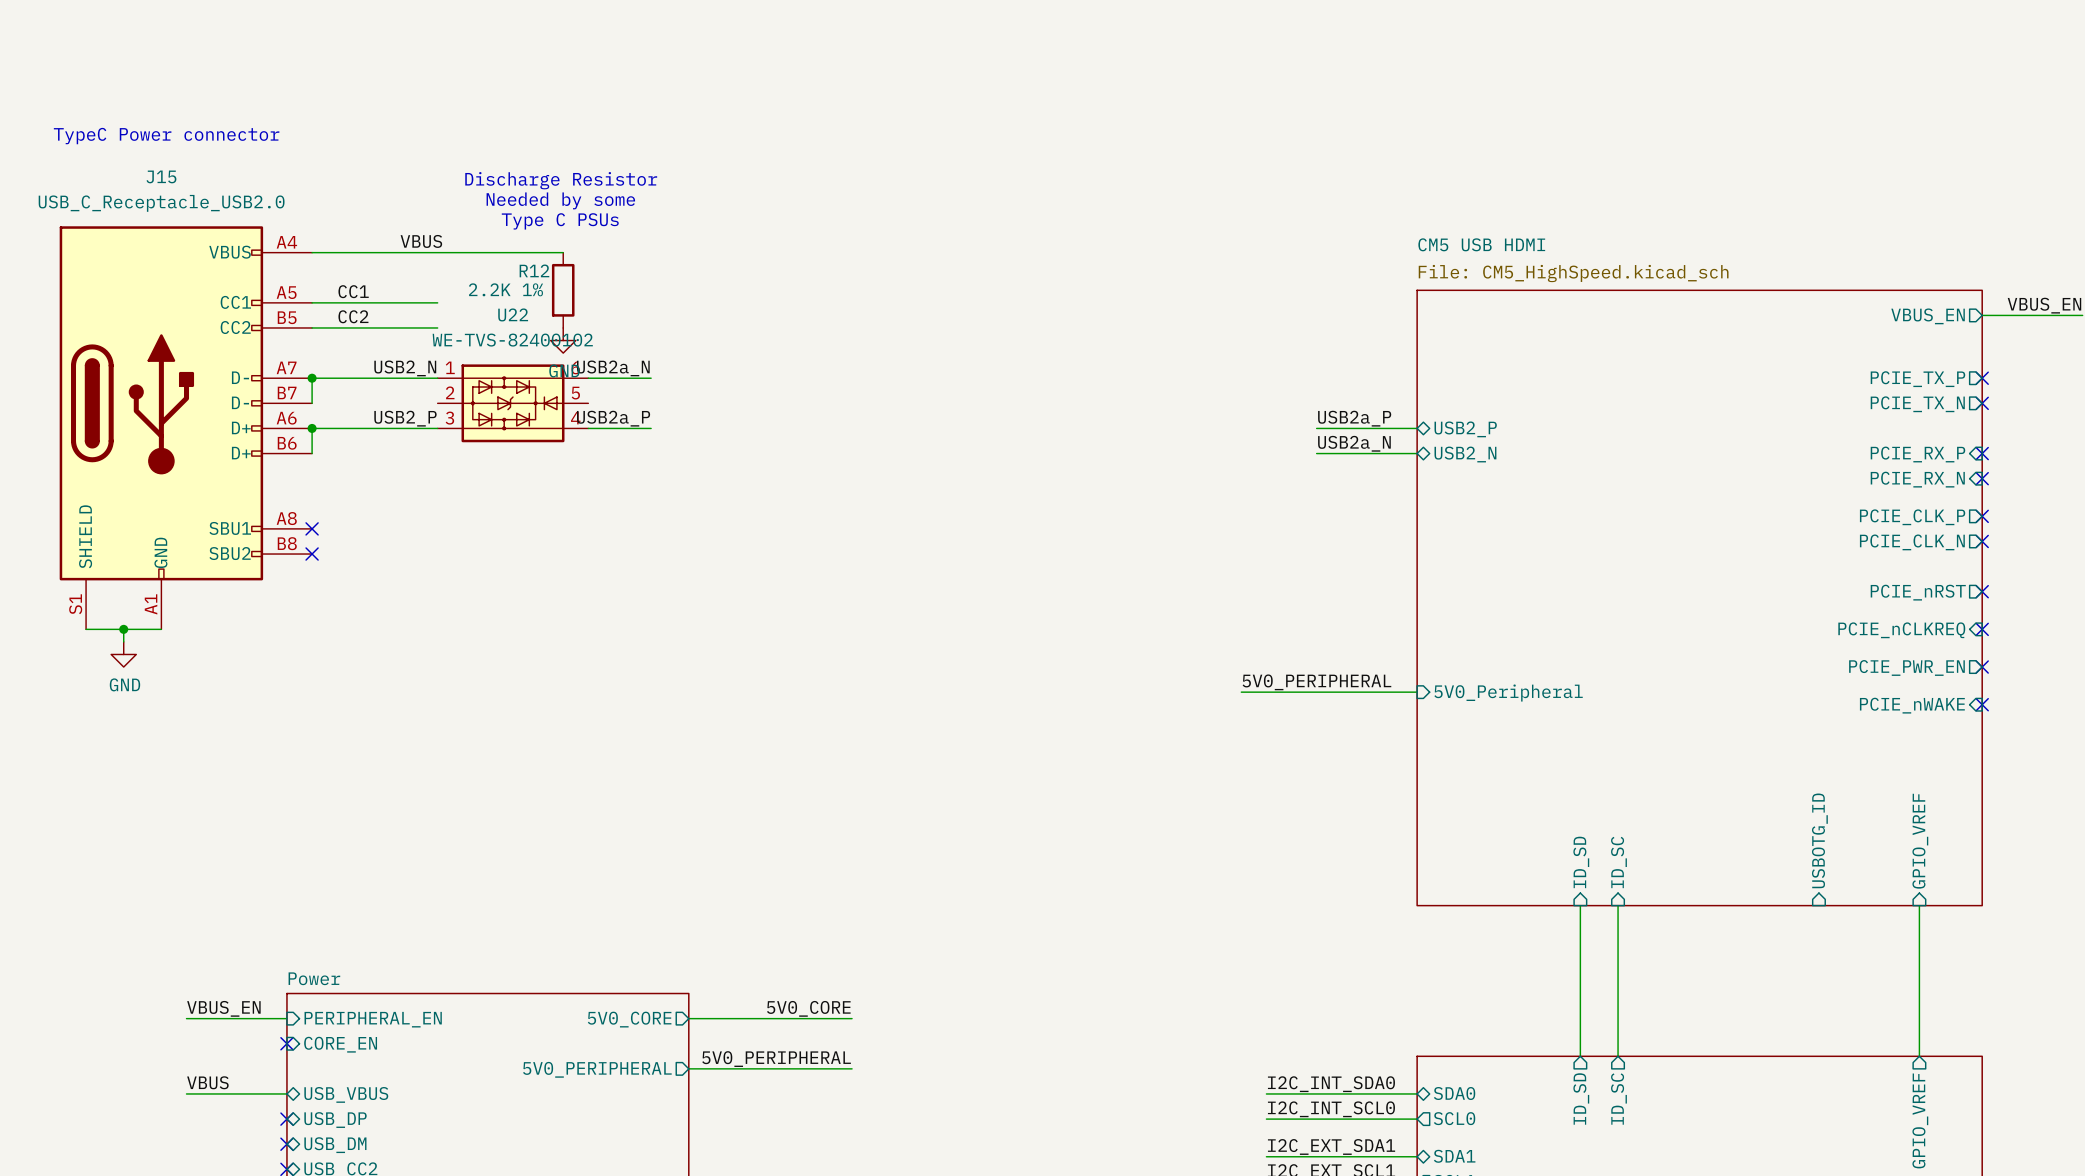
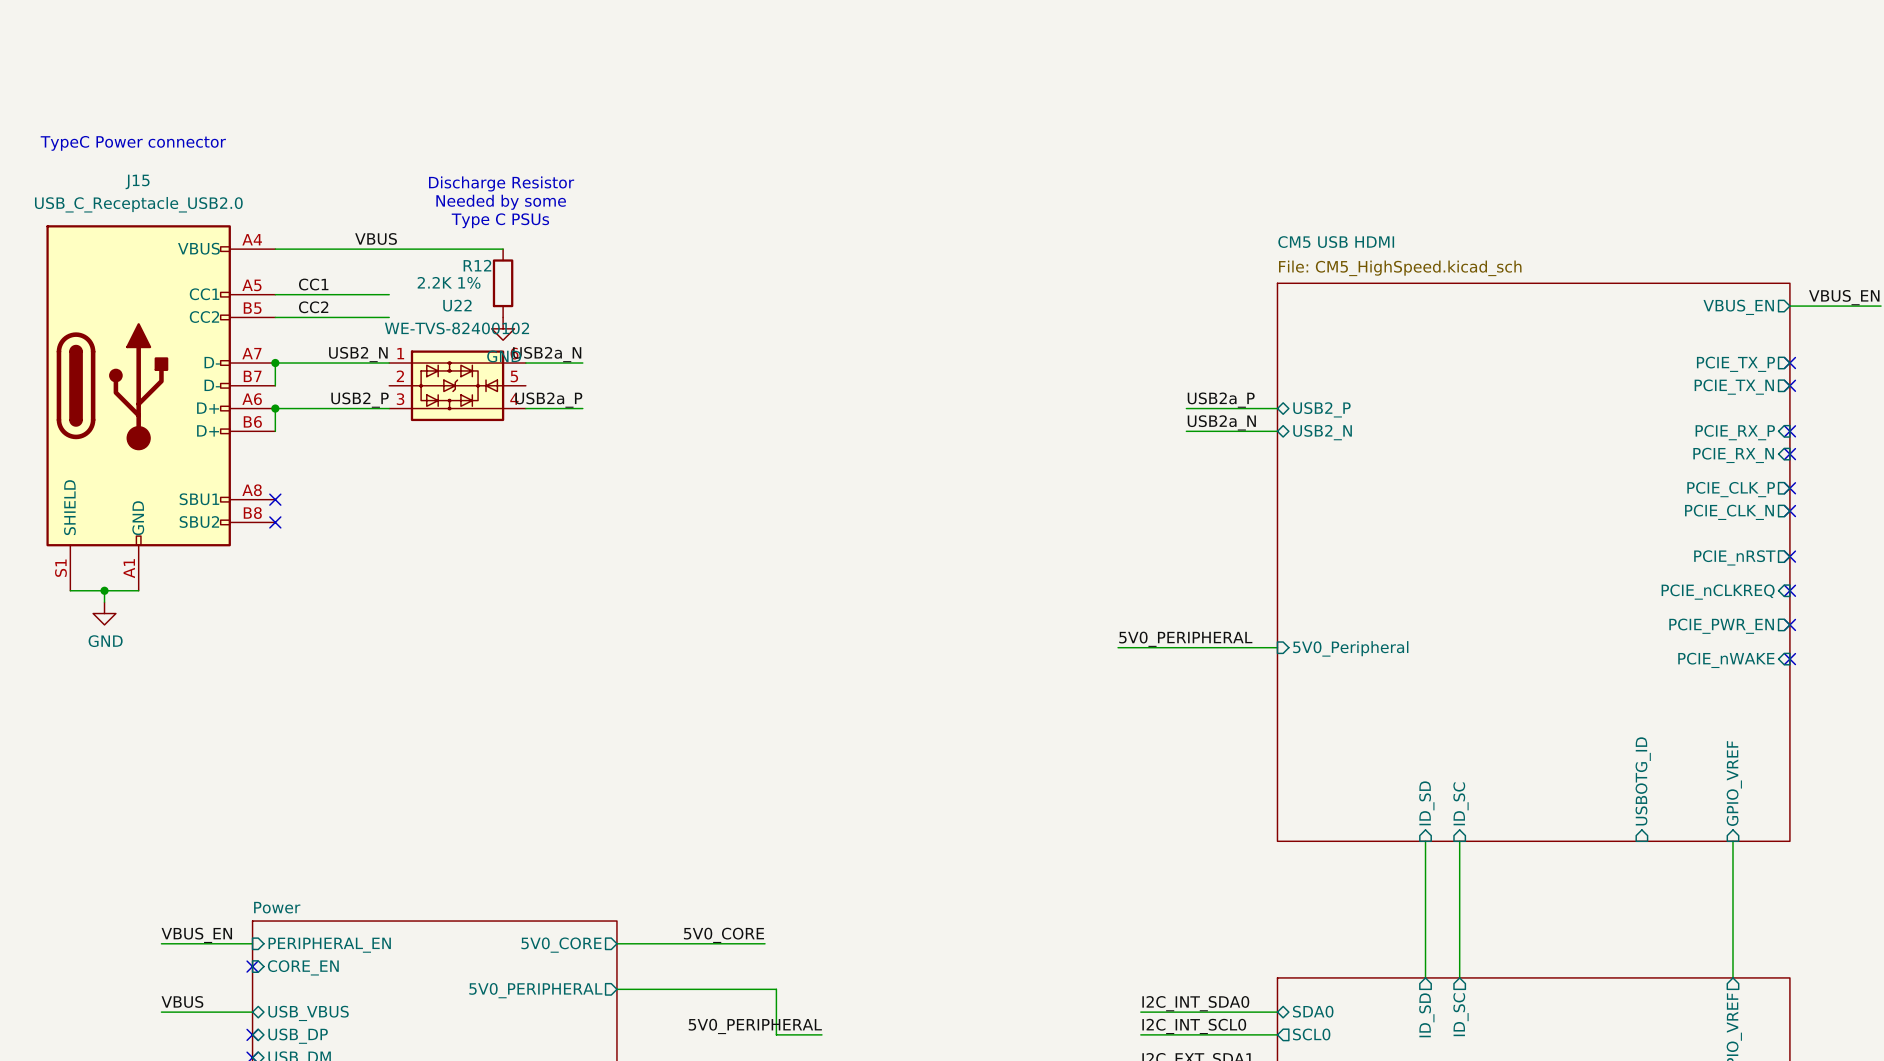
label position: 5V0_PERIPHERAL (776, 1059) -> 5V0_PERIPHERAL (755, 1026)
wire: none -> (765, 989) (776, 989) (776, 1034) (821, 1034)

